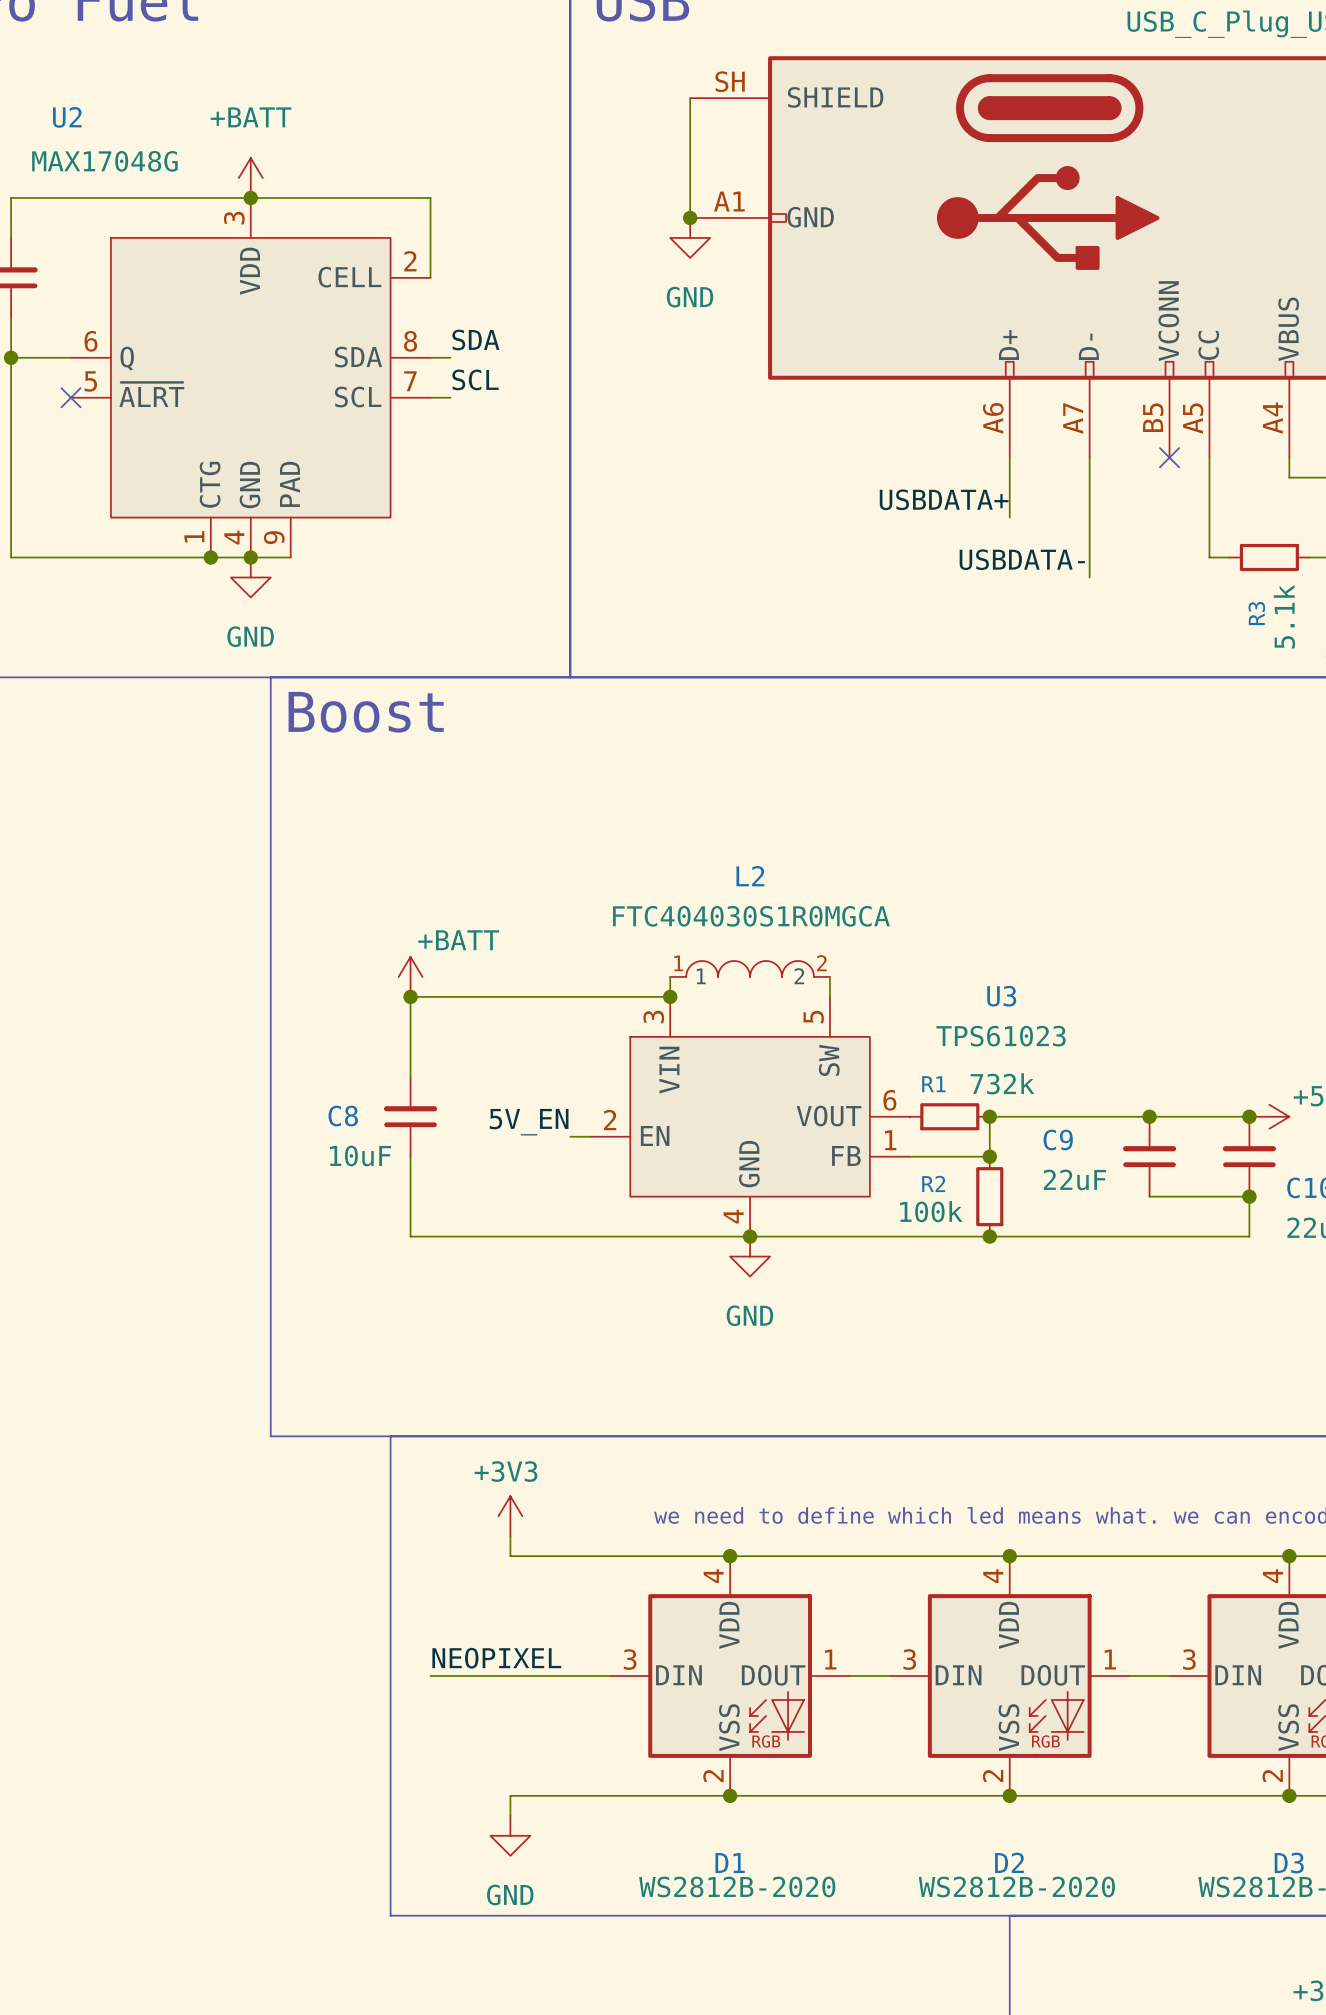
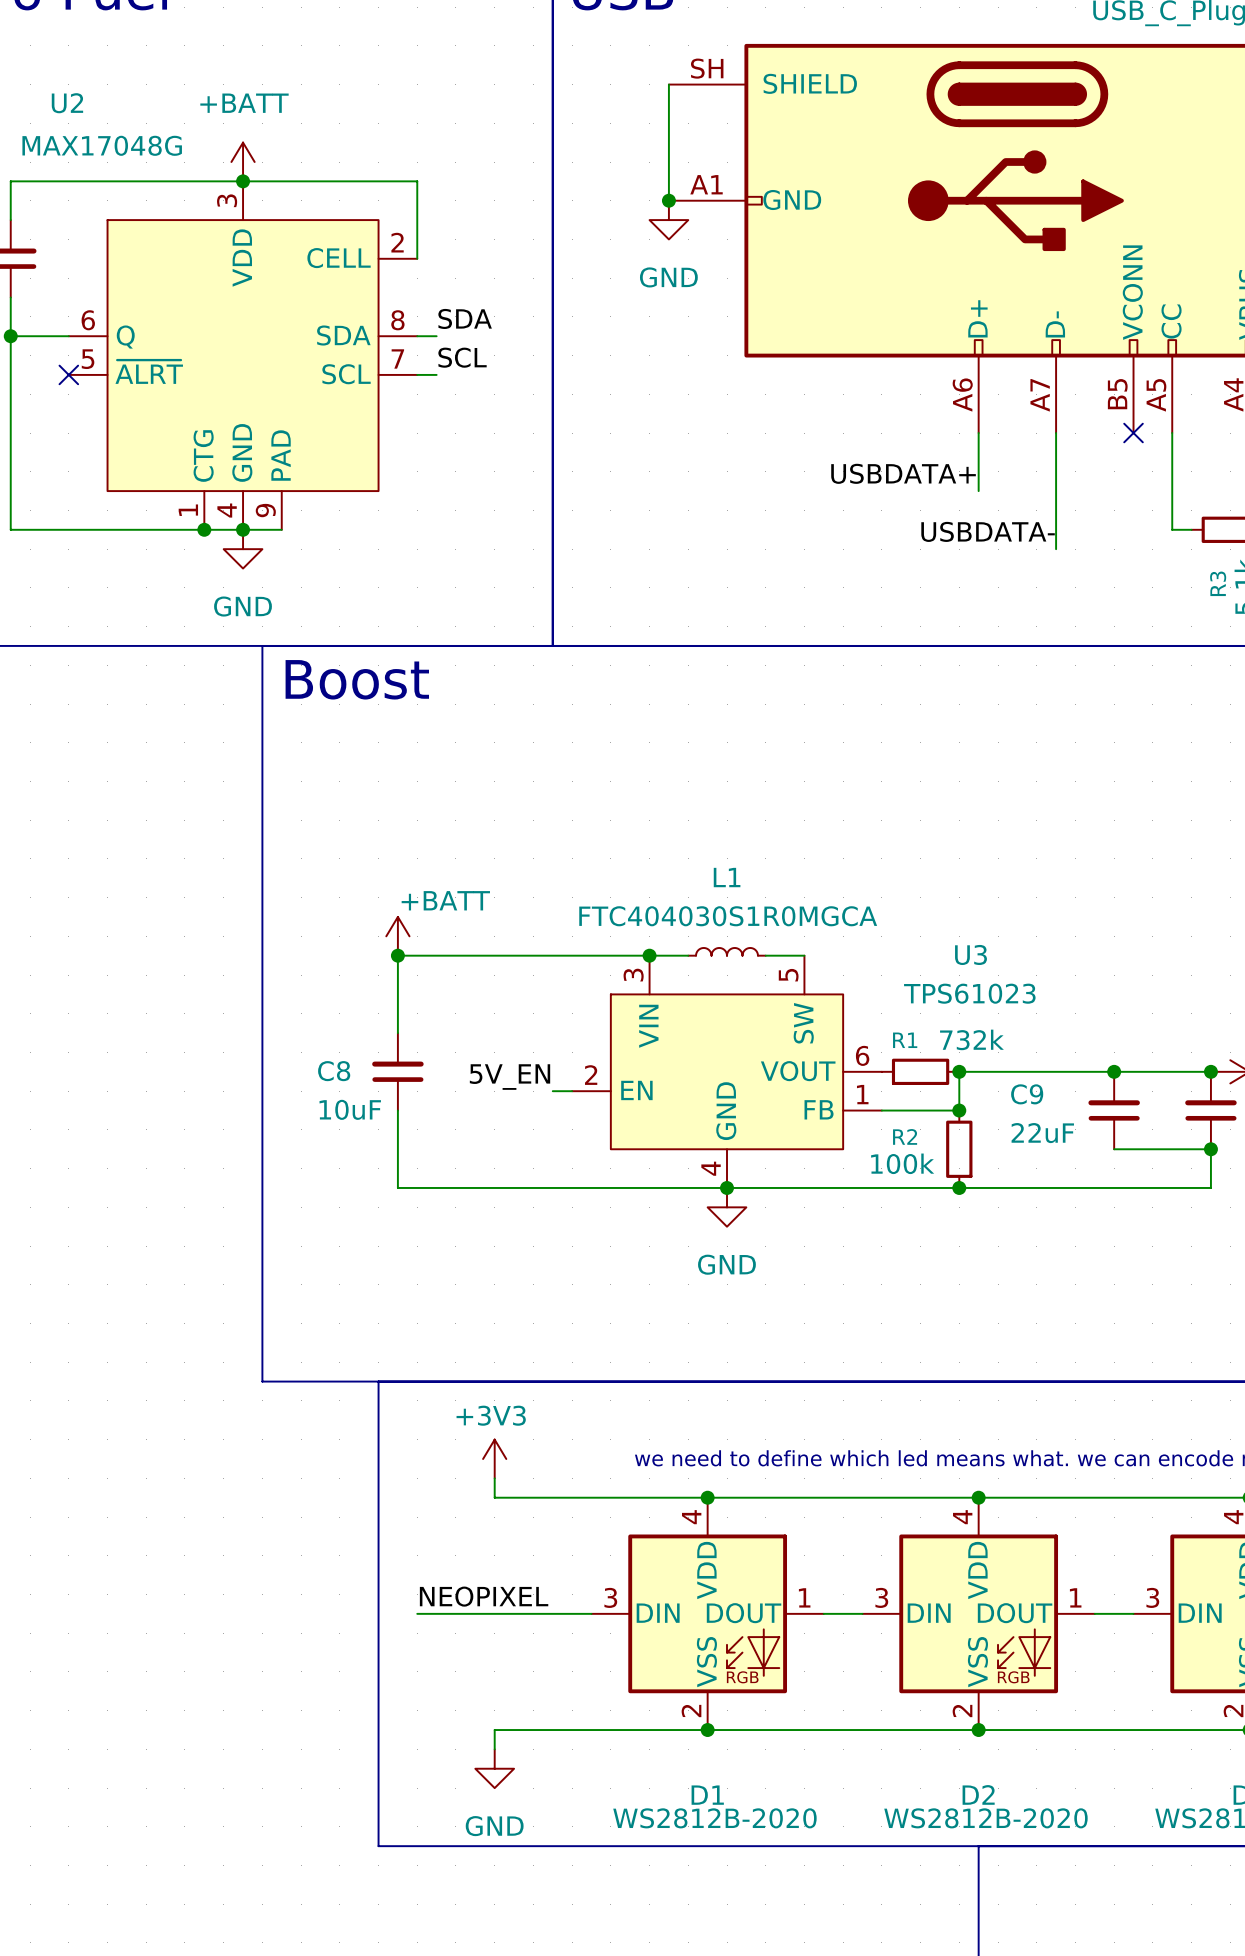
L2: FTC404030S1R0MGCA (750, 969) -> none
wire: (670, 976) (670, 996) -> (688, 955) (649, 955)
wire: (829, 976) (829, 996) -> (765, 955) (804, 955)
L1: none -> FTC404030S1R0MGCA (727, 951)

